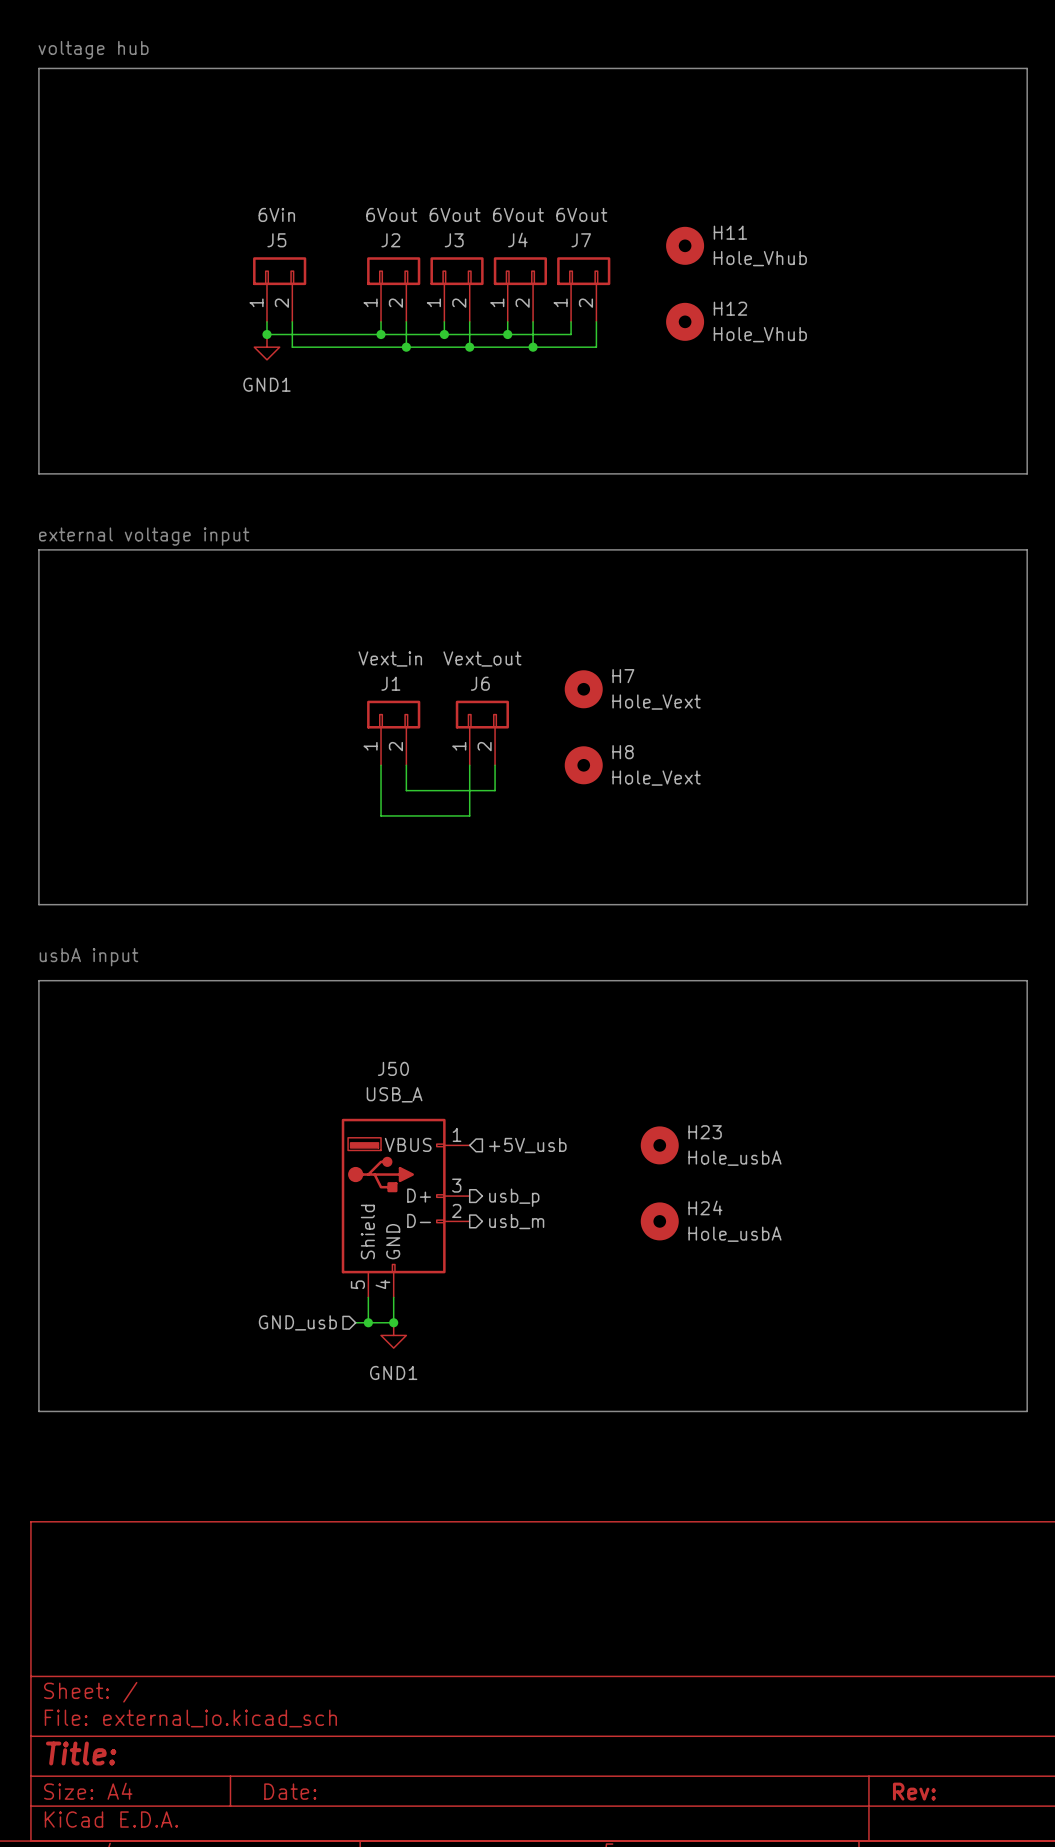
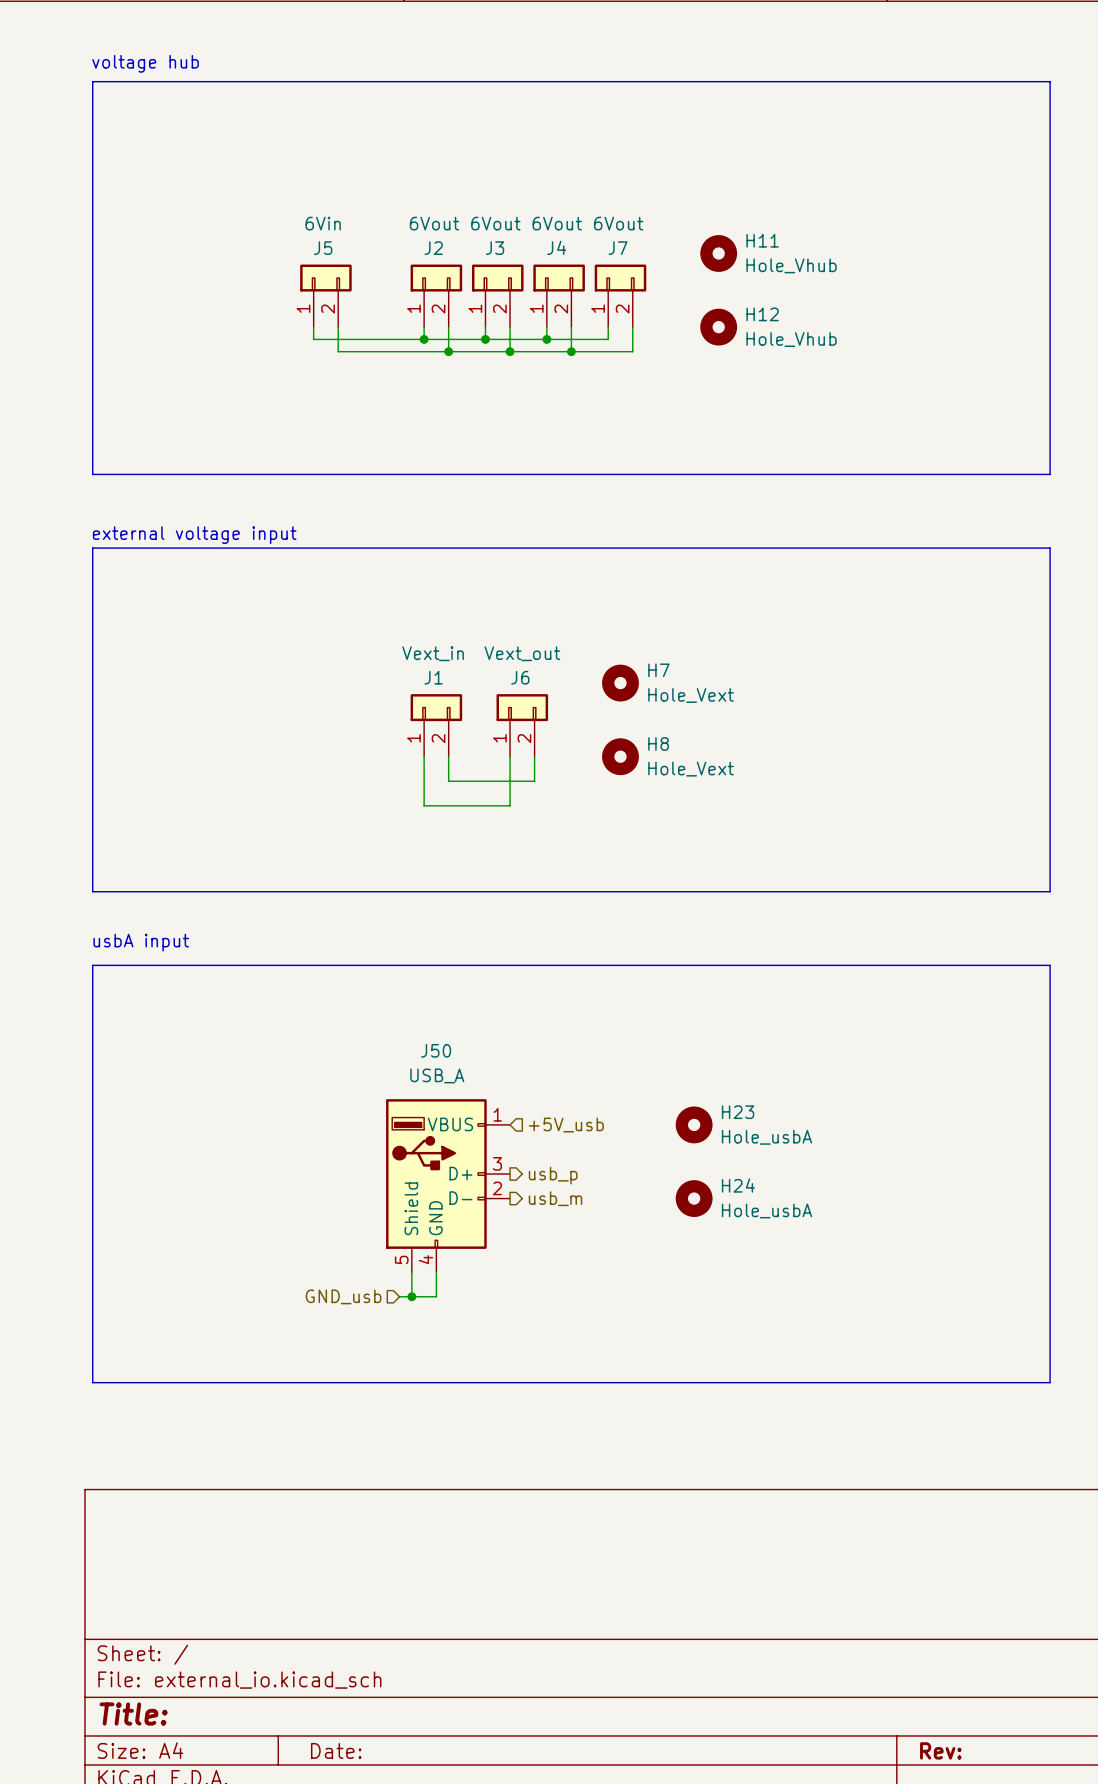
junction: (266, 334) -> none
power symbol: GND1 (266, 347) -> none
junction: (393, 1322) -> none
power symbol: GND1 (393, 1335) -> none

